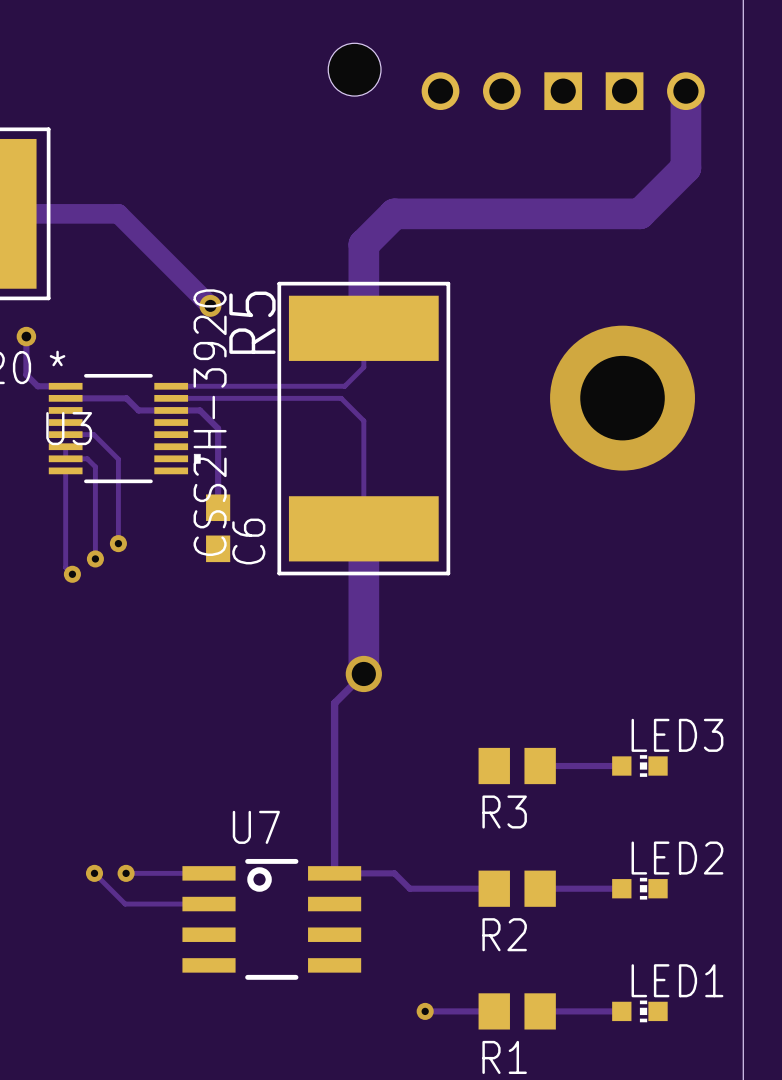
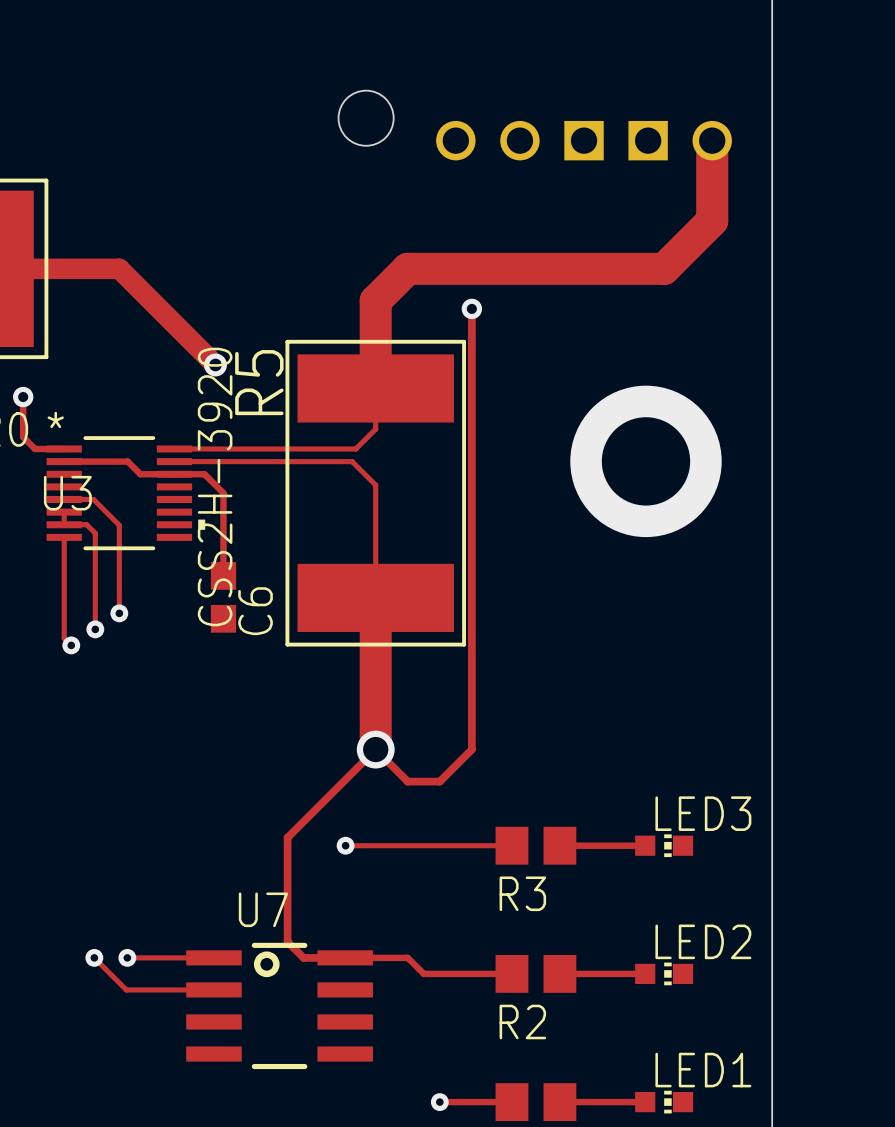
track: none -> (471, 308) (471, 749) (439, 781) (407, 781) (375, 749)
via: none -> (471, 308)
track: (334, 703) (334, 873) -> (345, 780) (287, 837) (287, 941) (303, 957) (345, 957)
track: none -> (345, 845) (511, 845)
via: none -> (345, 845)

